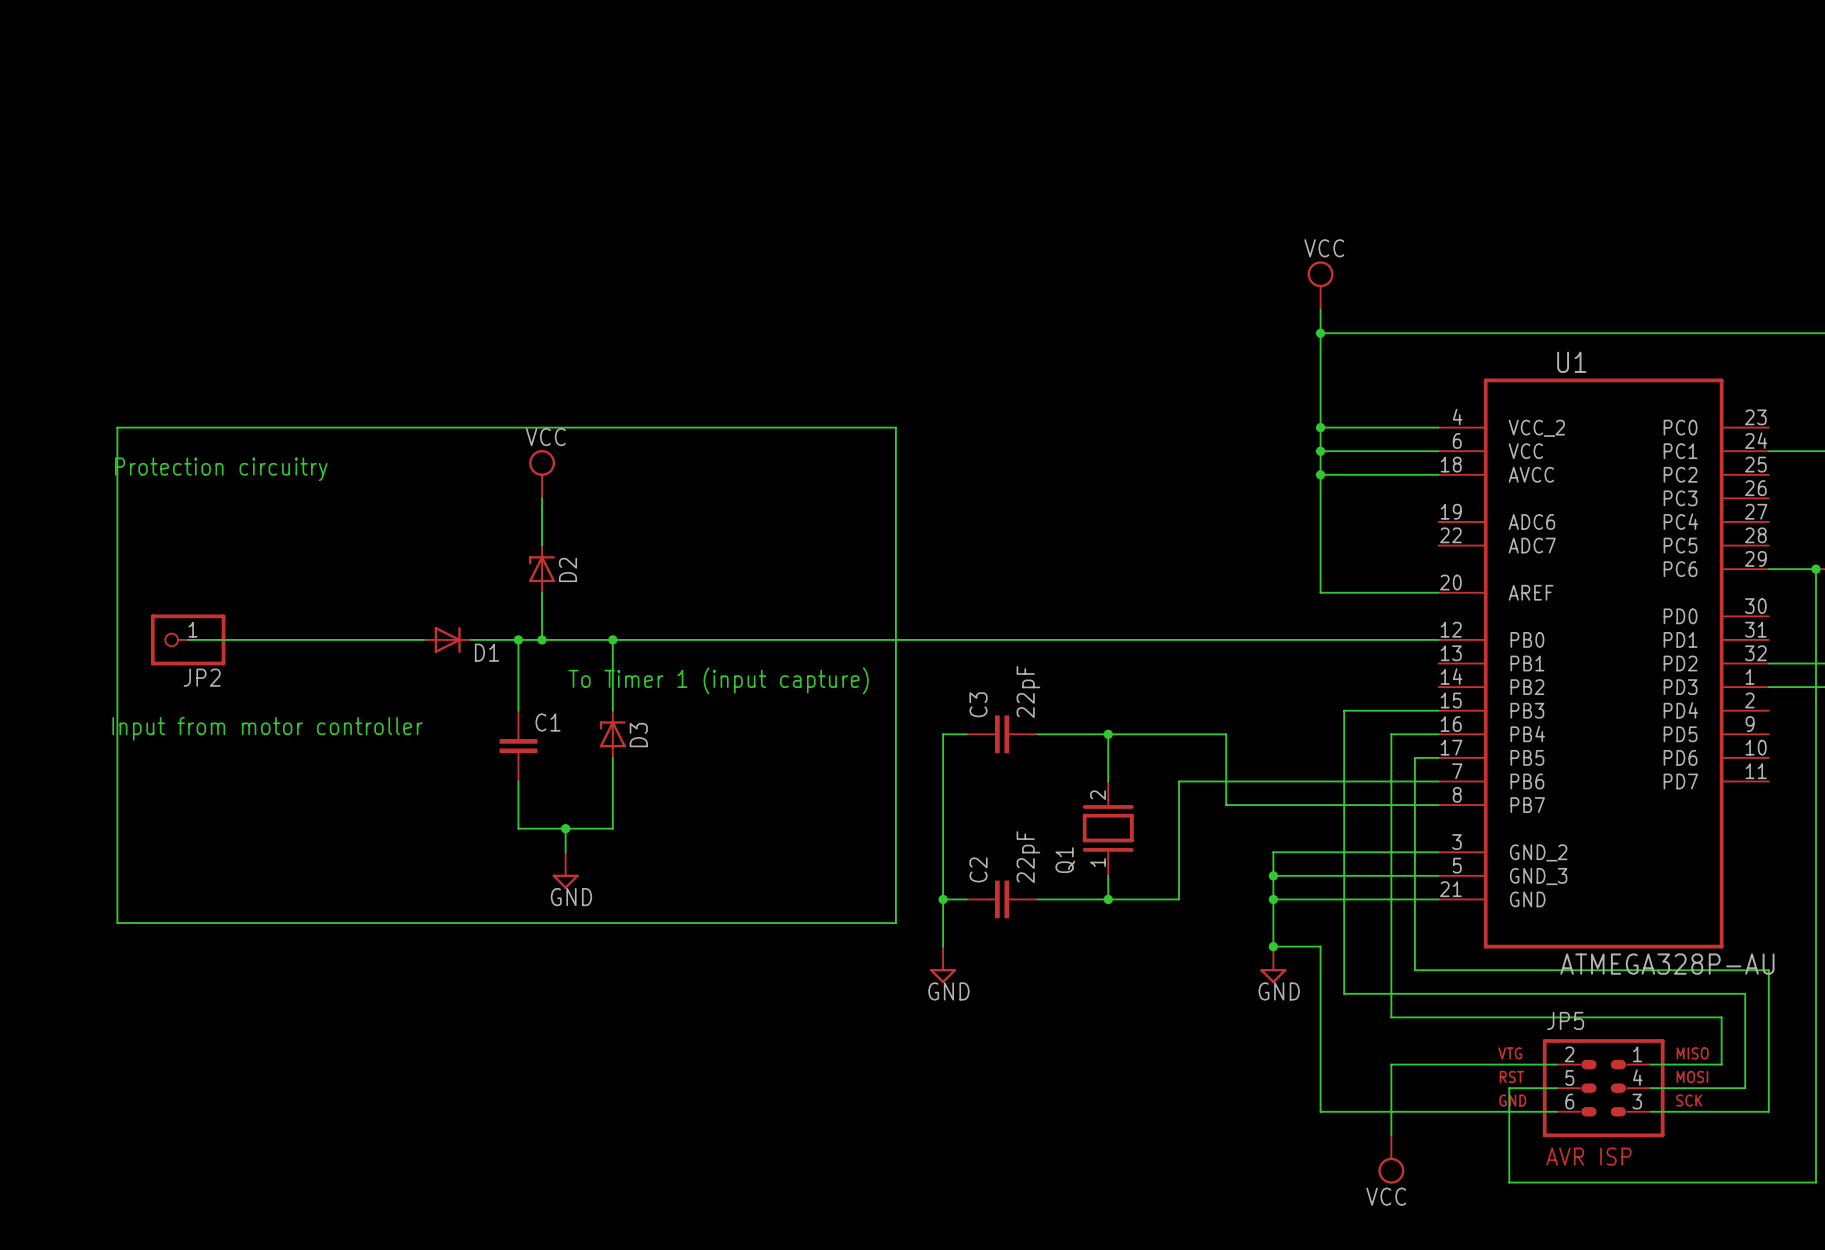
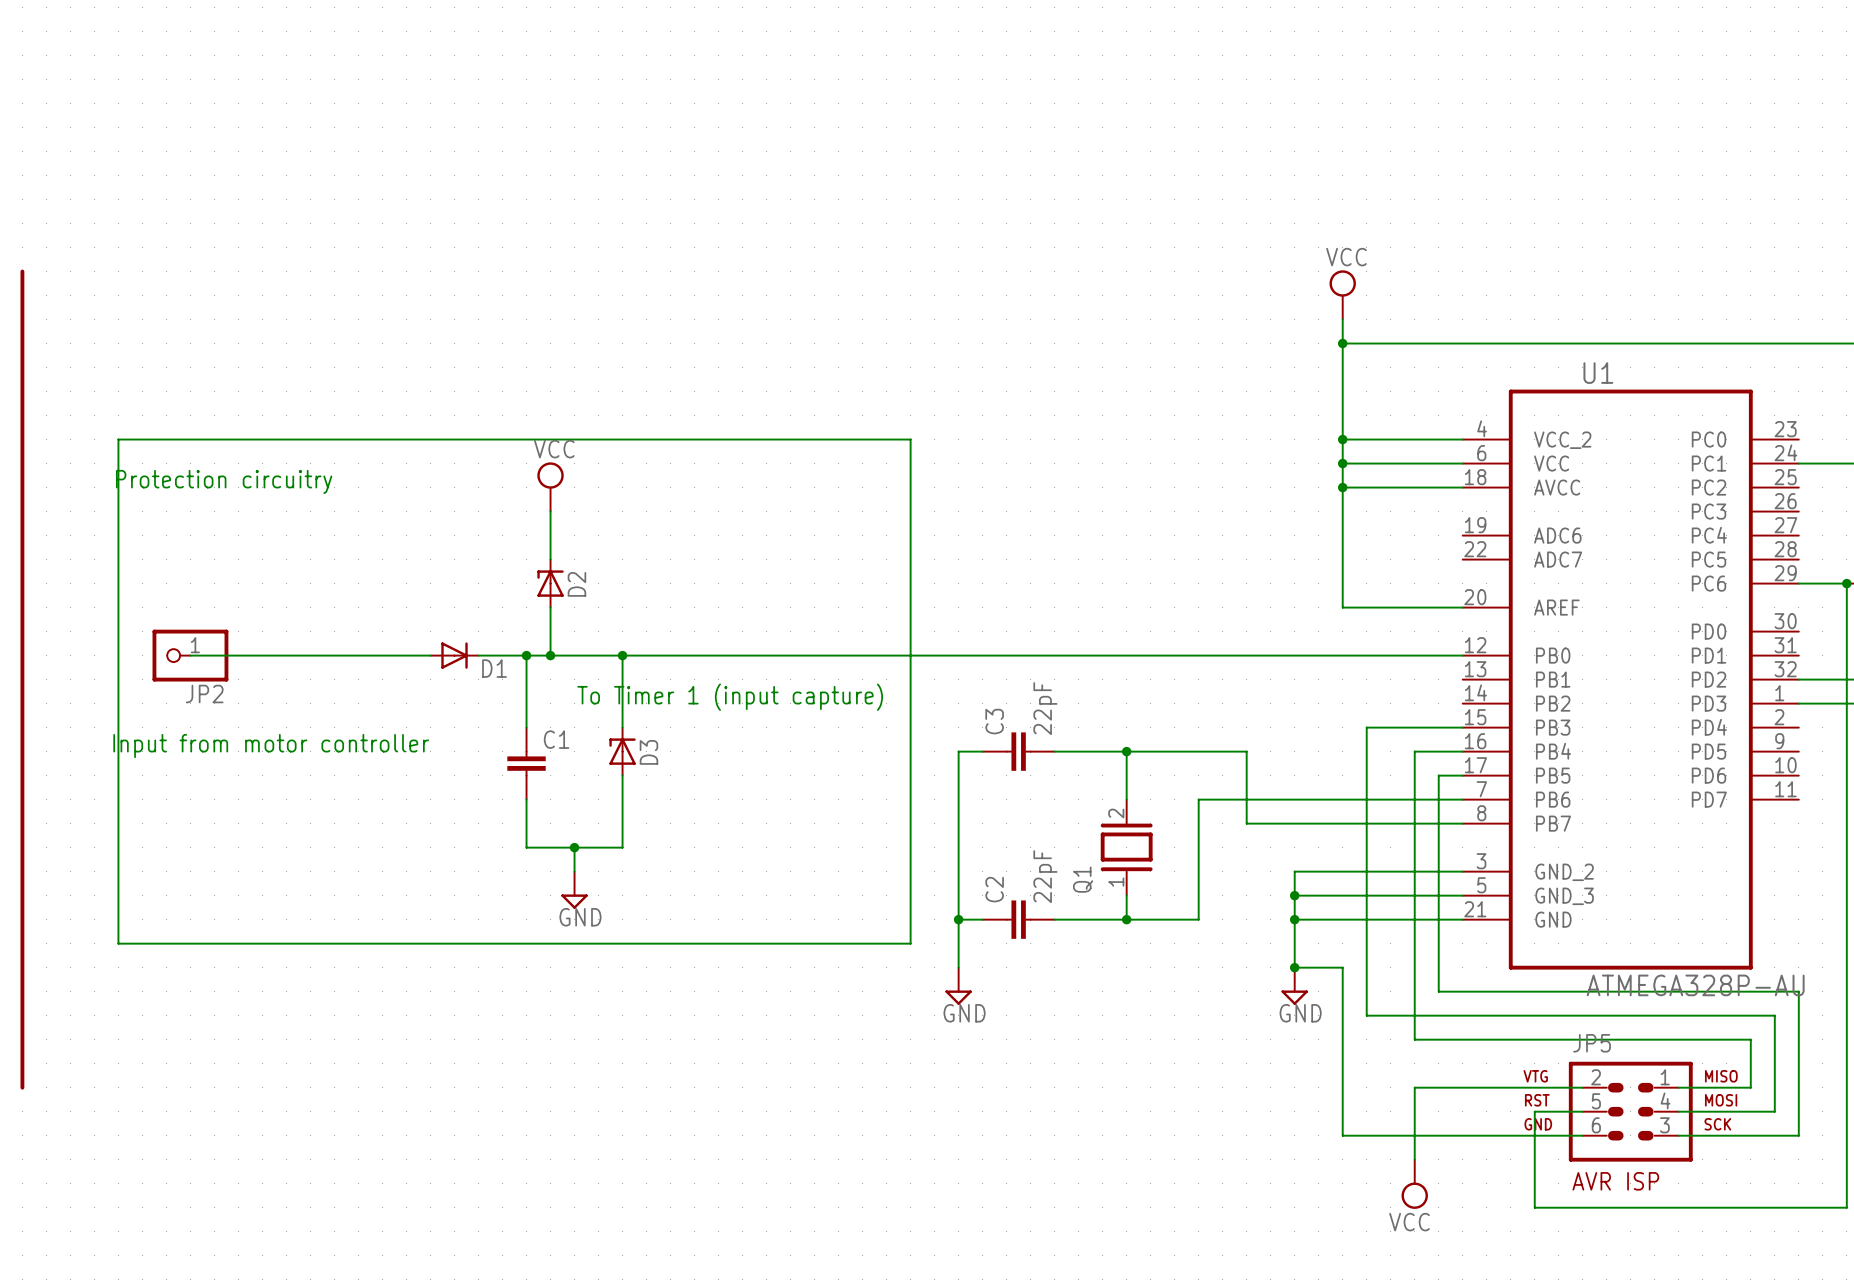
line: none -> (22, 271) (22, 1087)

